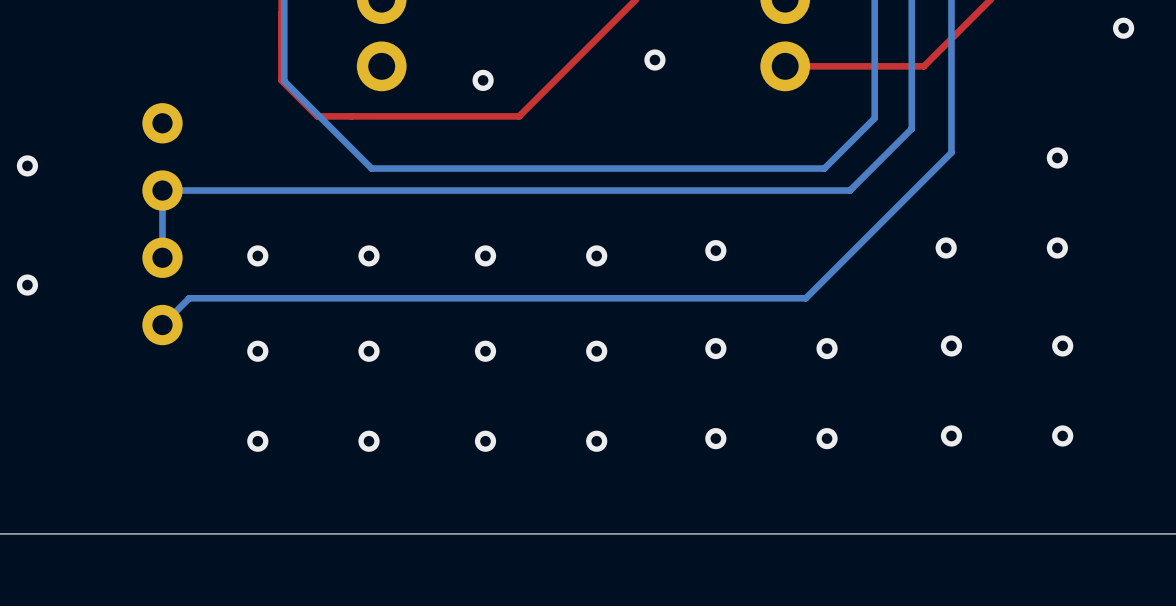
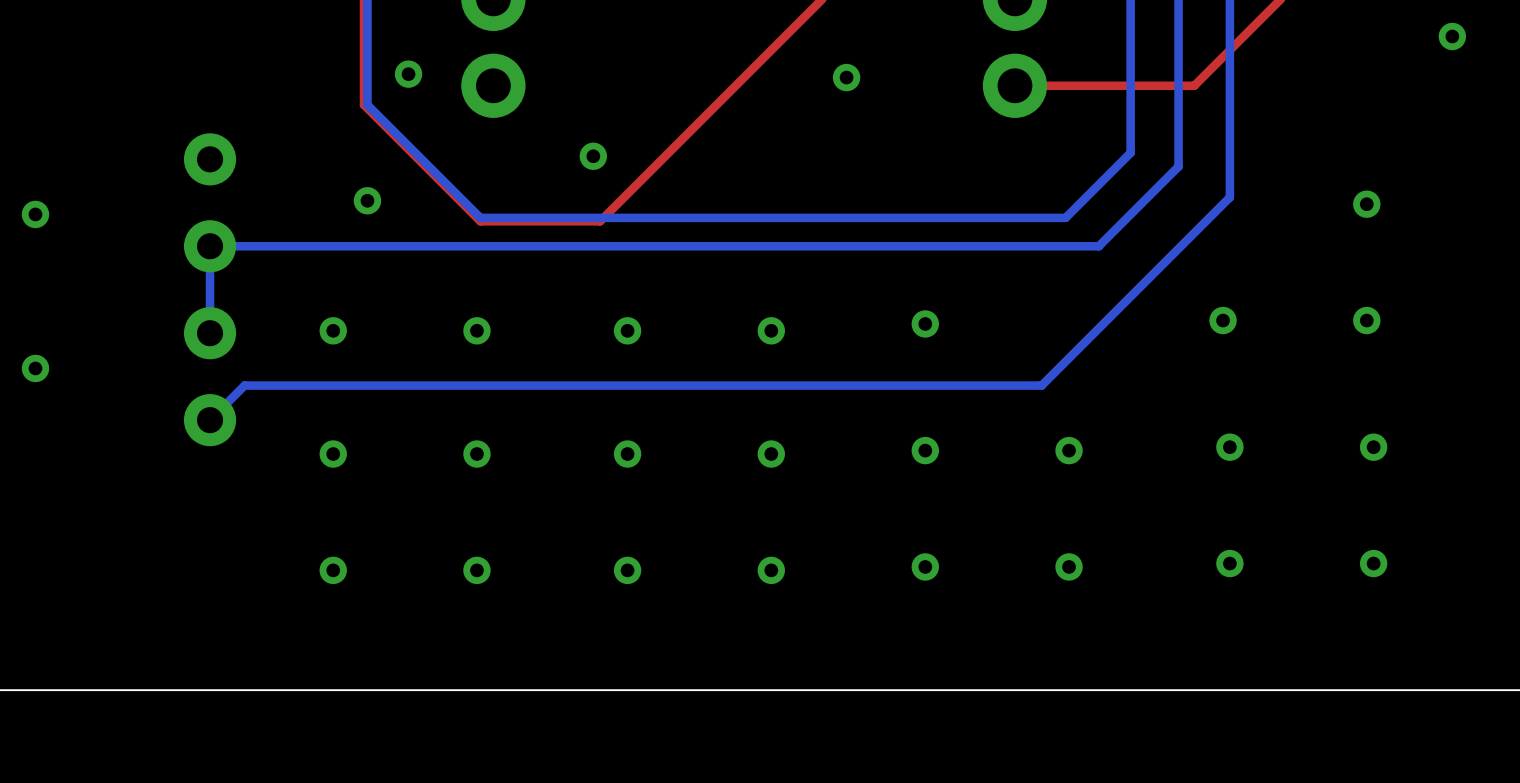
top track: (281, 13) (281, 80) (317, 116) (519, 116) -> (364, 60) (364, 104) (480, 221) (600, 221) (671, 150)
via: none -> (408, 74)
via position: (483, 80) -> (593, 156)
via: none -> (367, 200)

